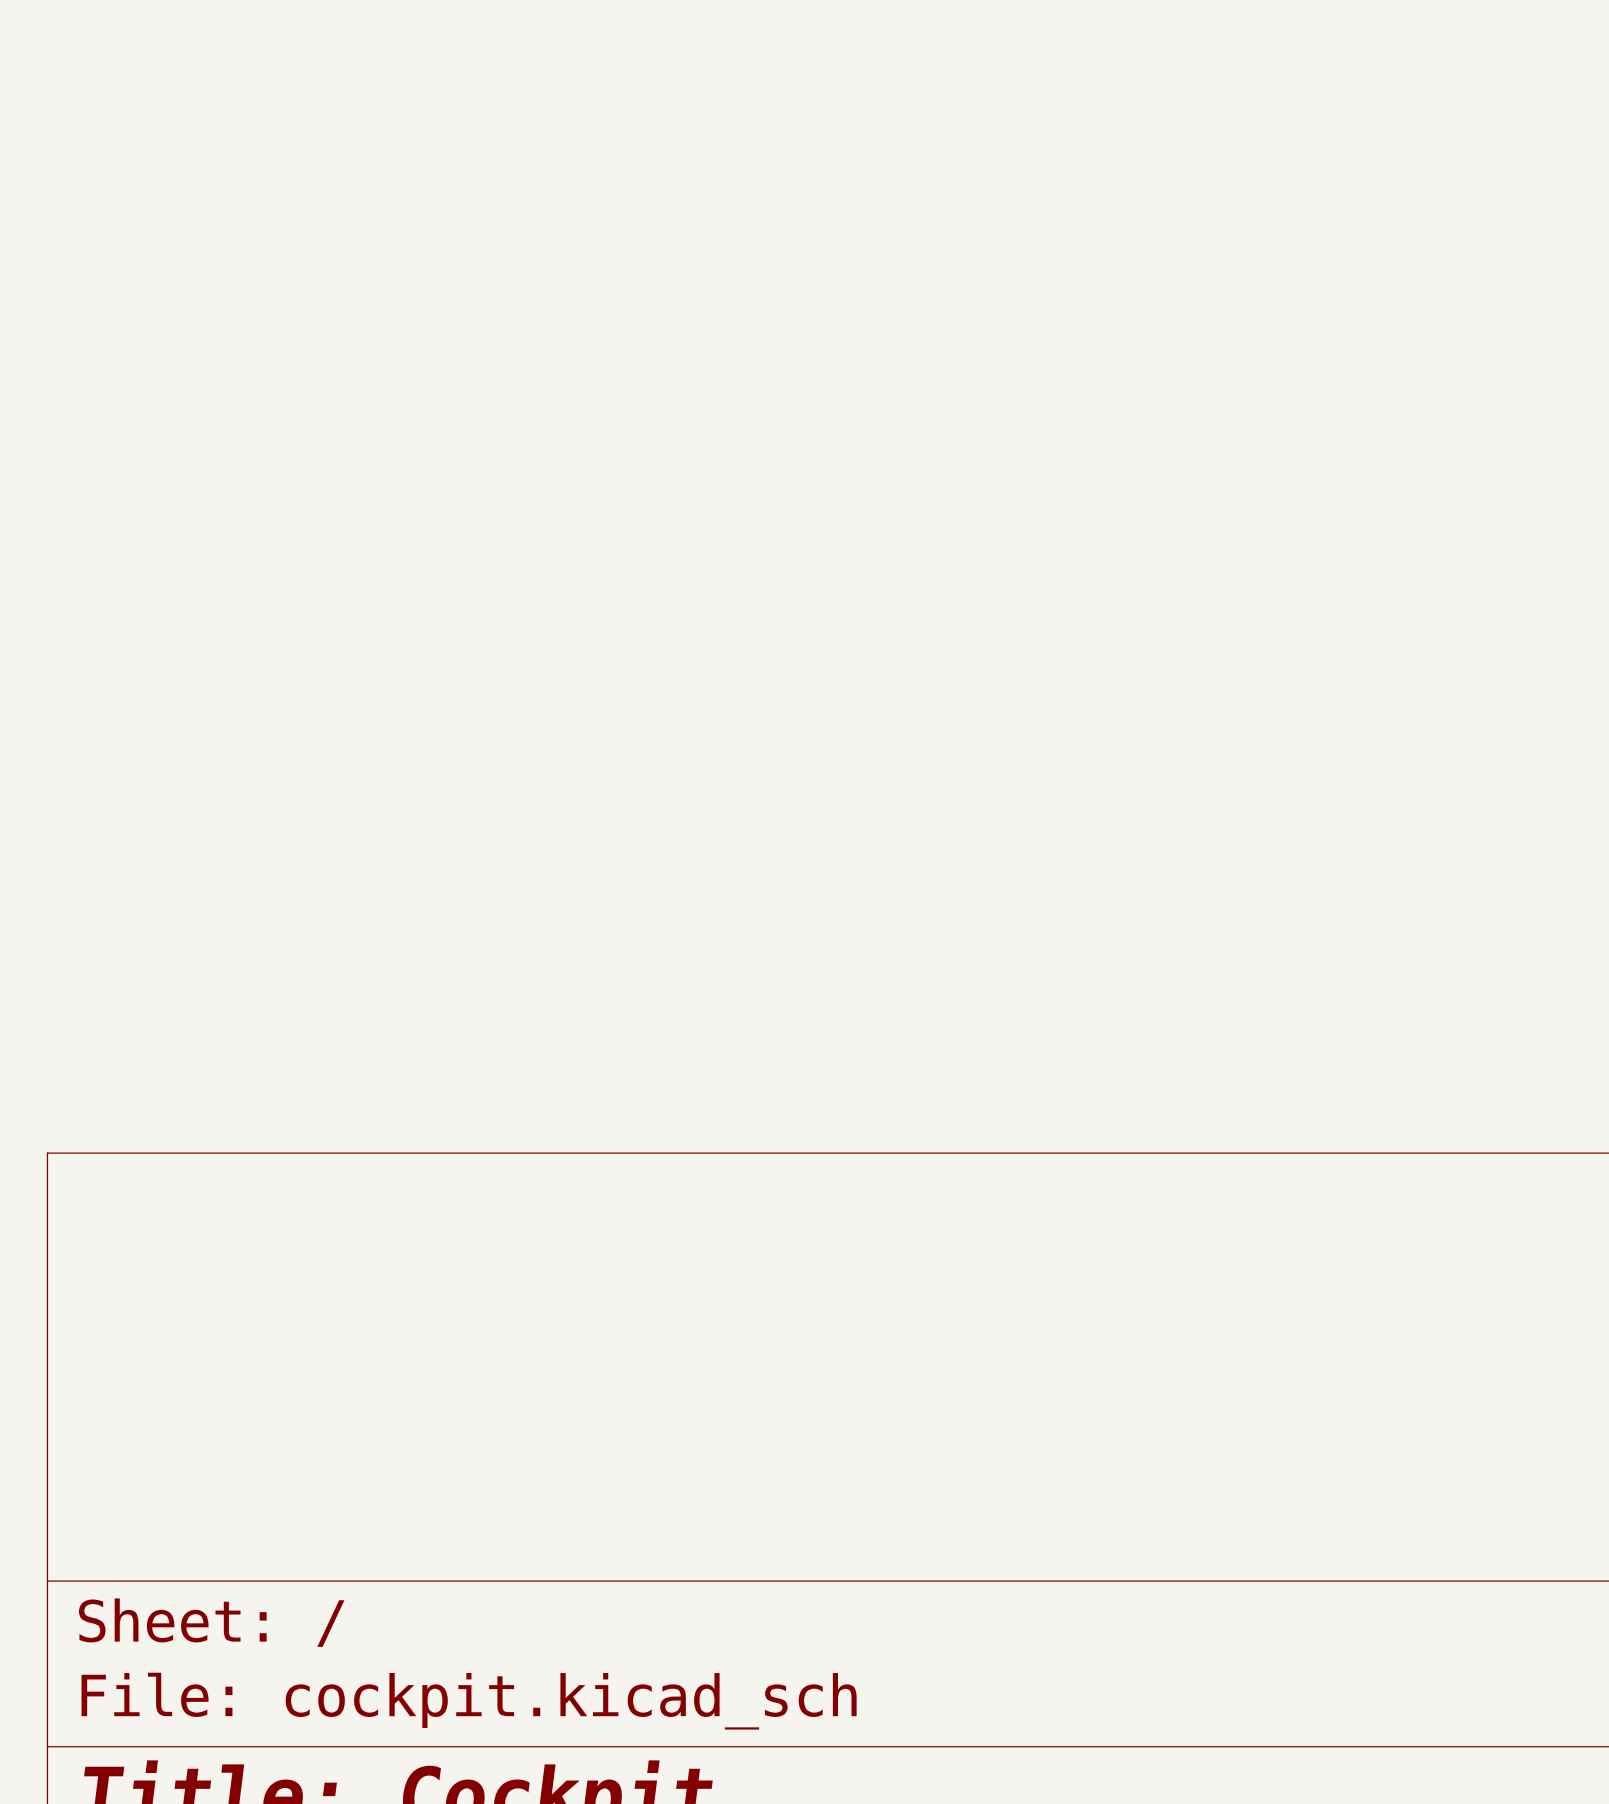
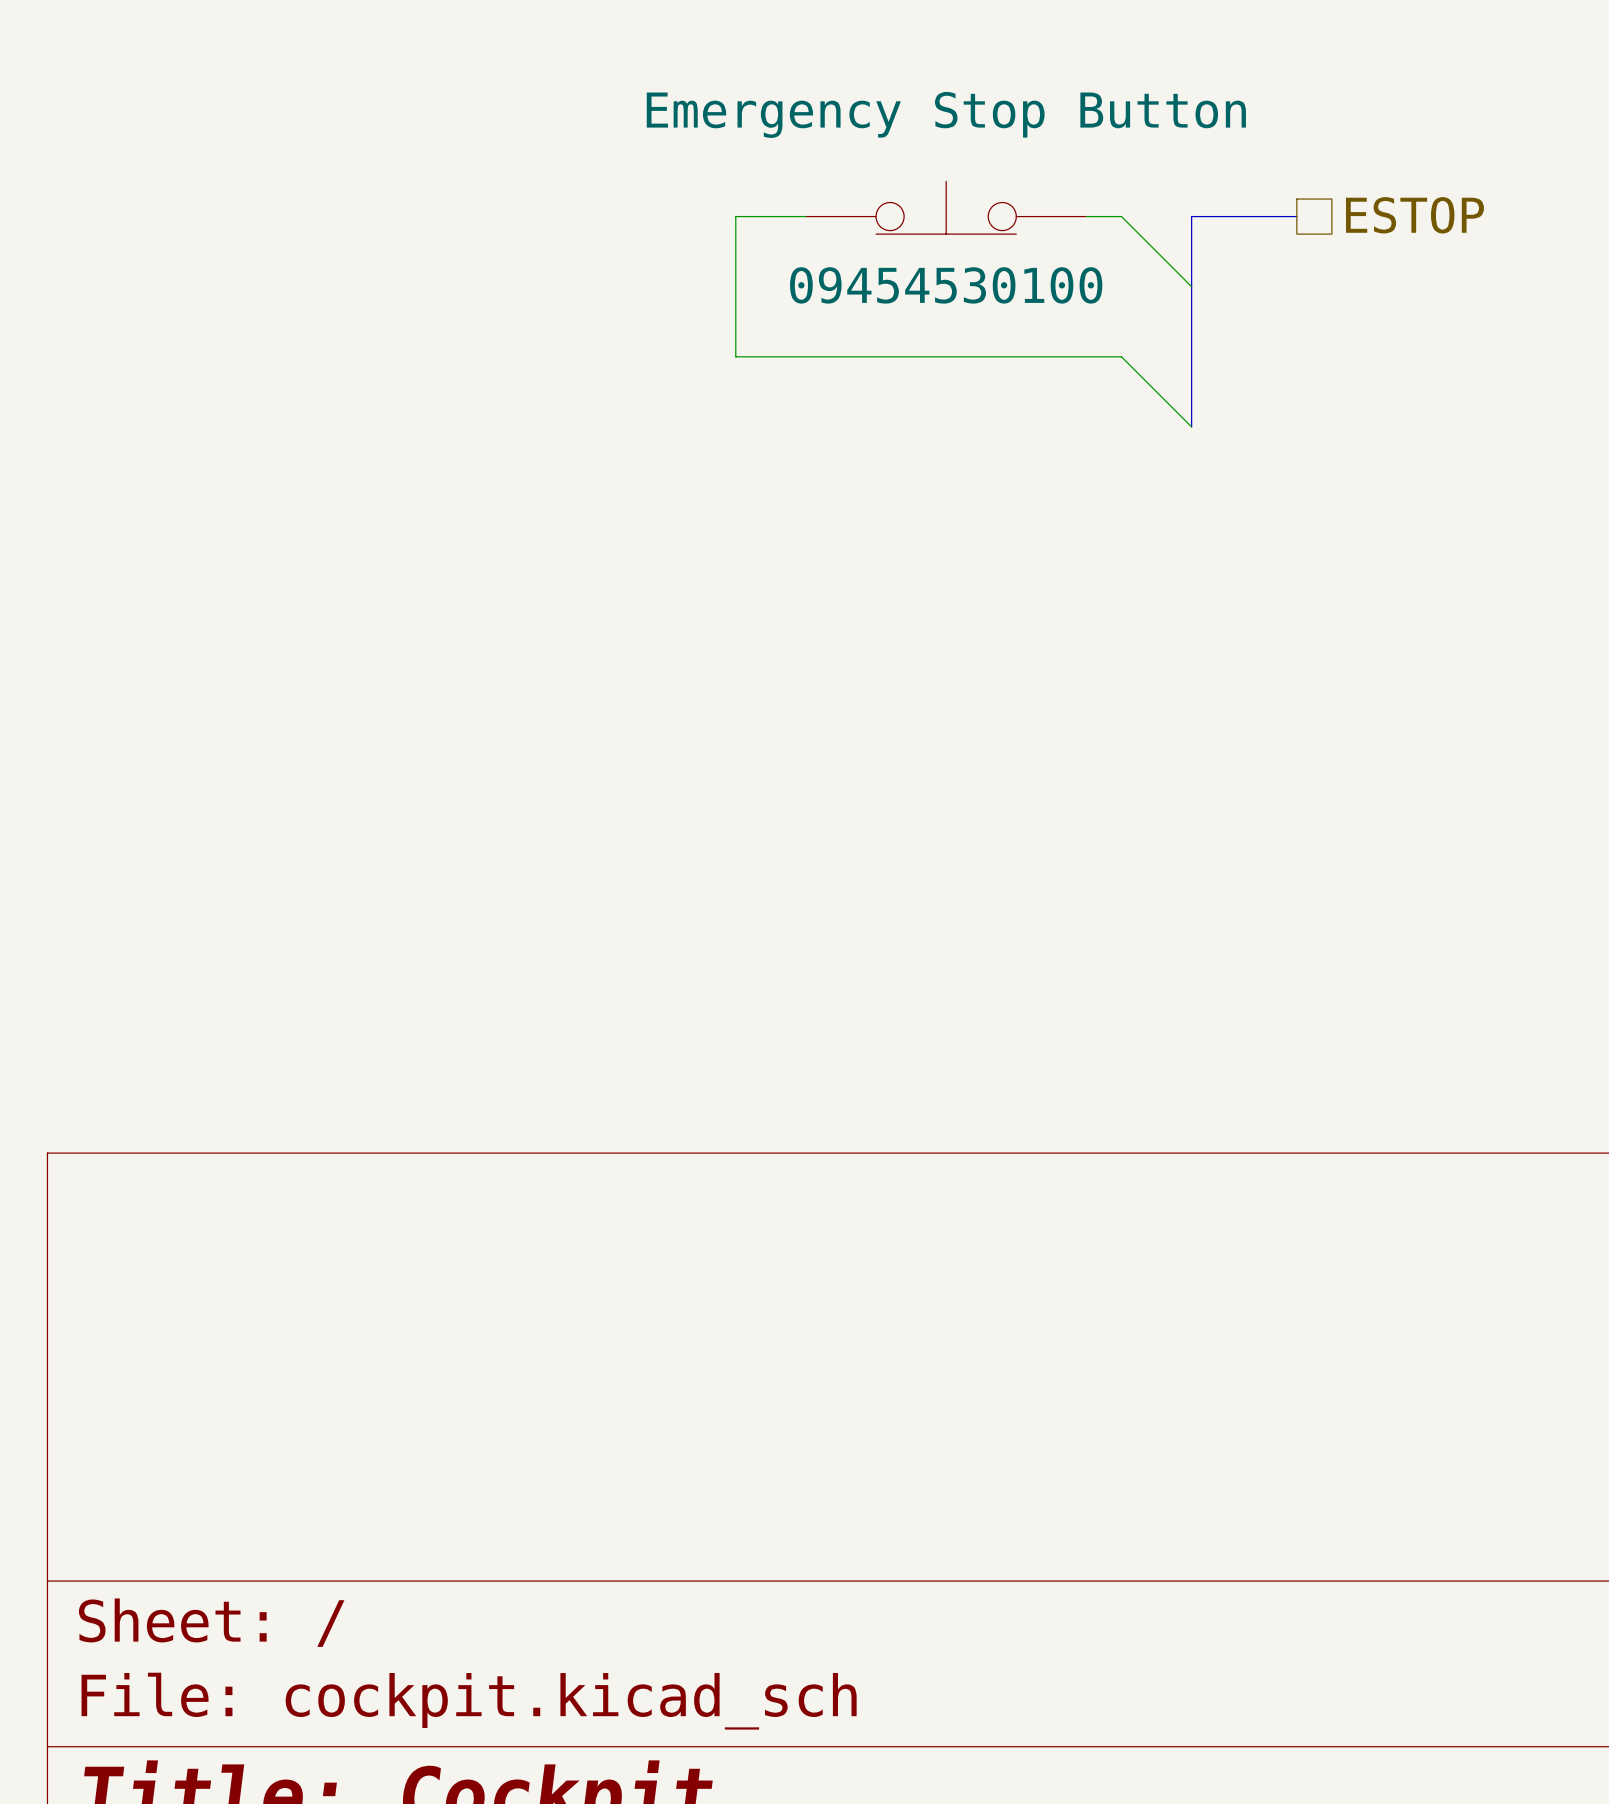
part: none -> Emergency Stop Button (946, 207)
hierarchical label: none -> ESTOP (1414, 215)
wire: none -> (805, 216) (735, 216) (735, 356) (1121, 356) (1191, 426)
wire: none -> (1086, 216) (1121, 216) (1191, 286)
bus: none -> (1296, 216) (1191, 216) (1191, 426)

